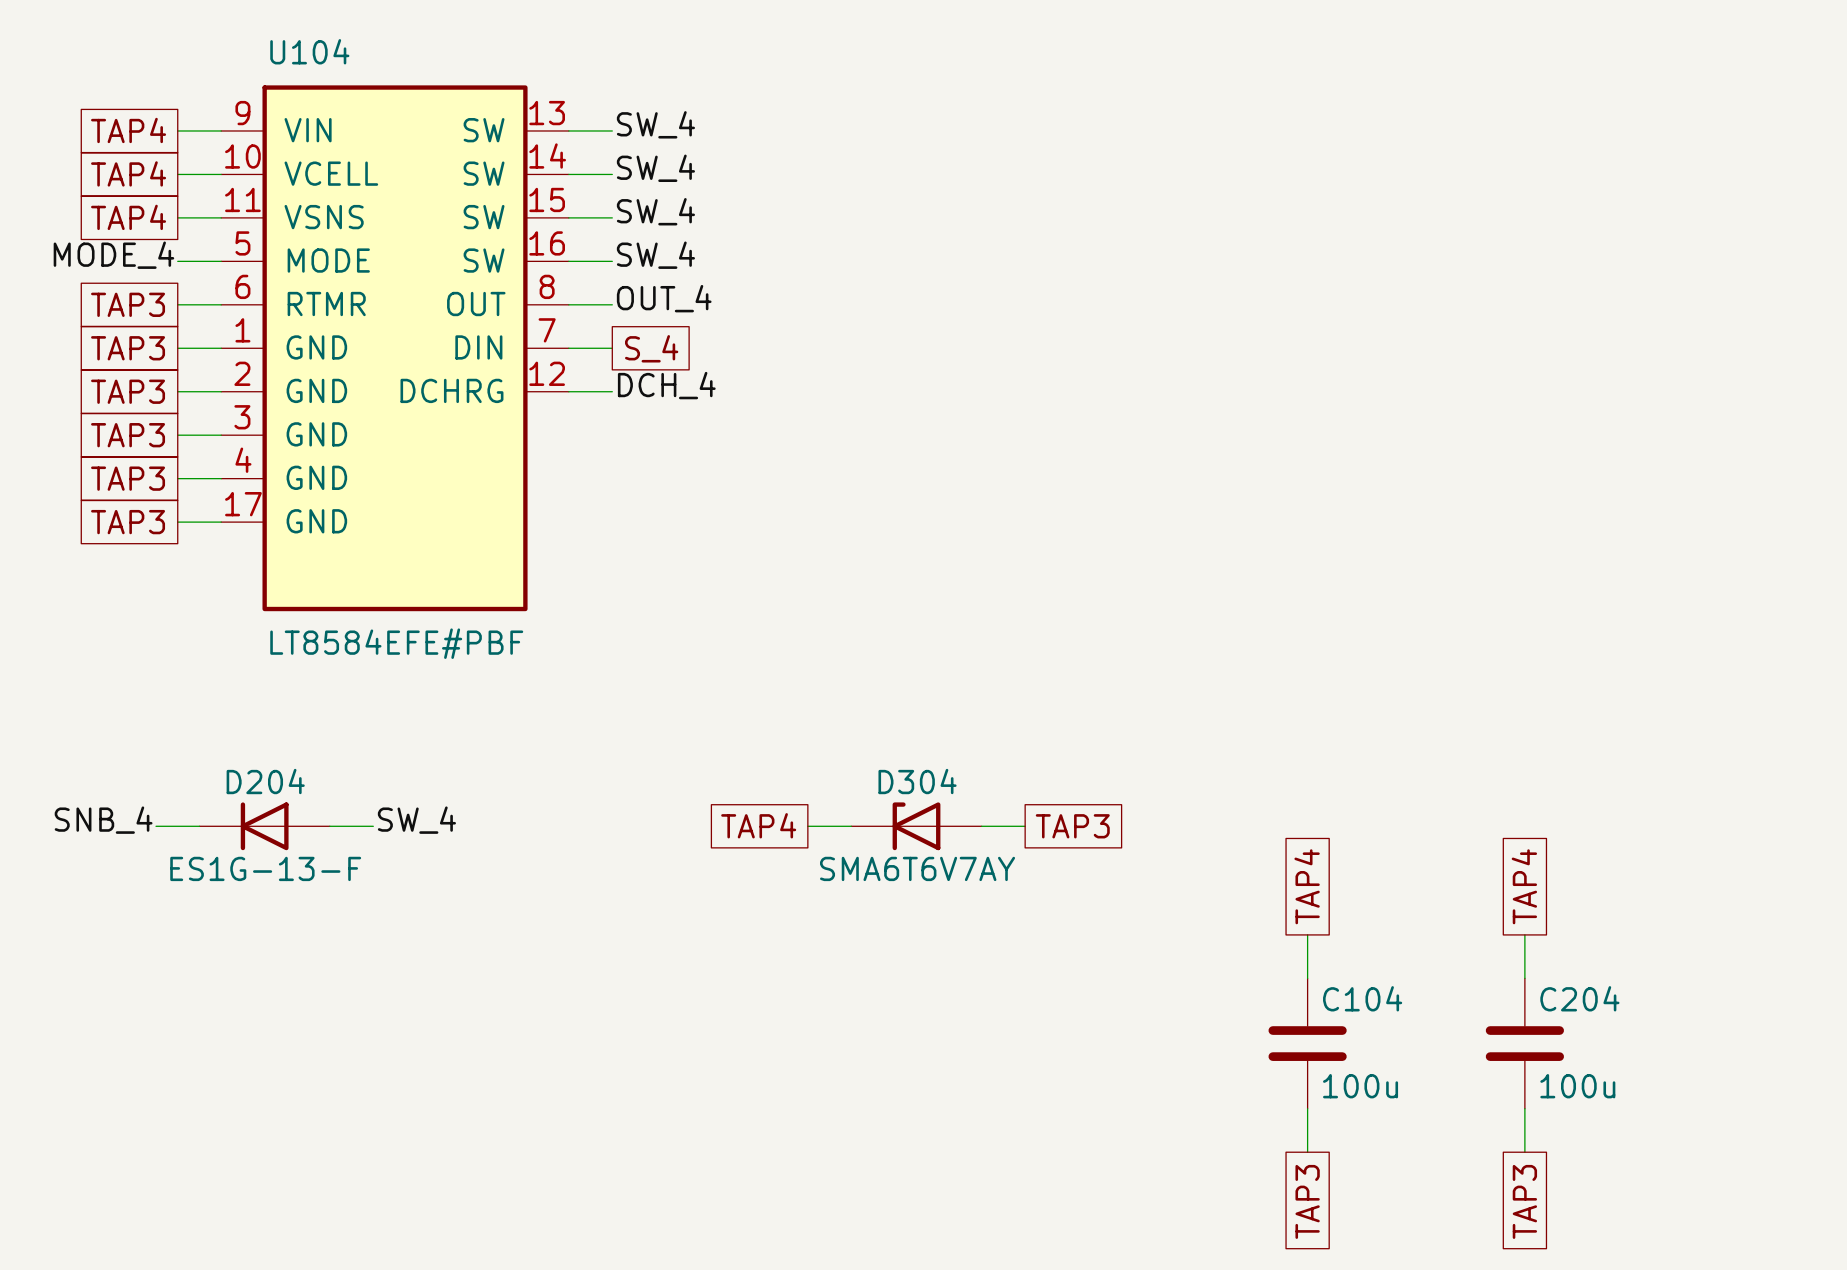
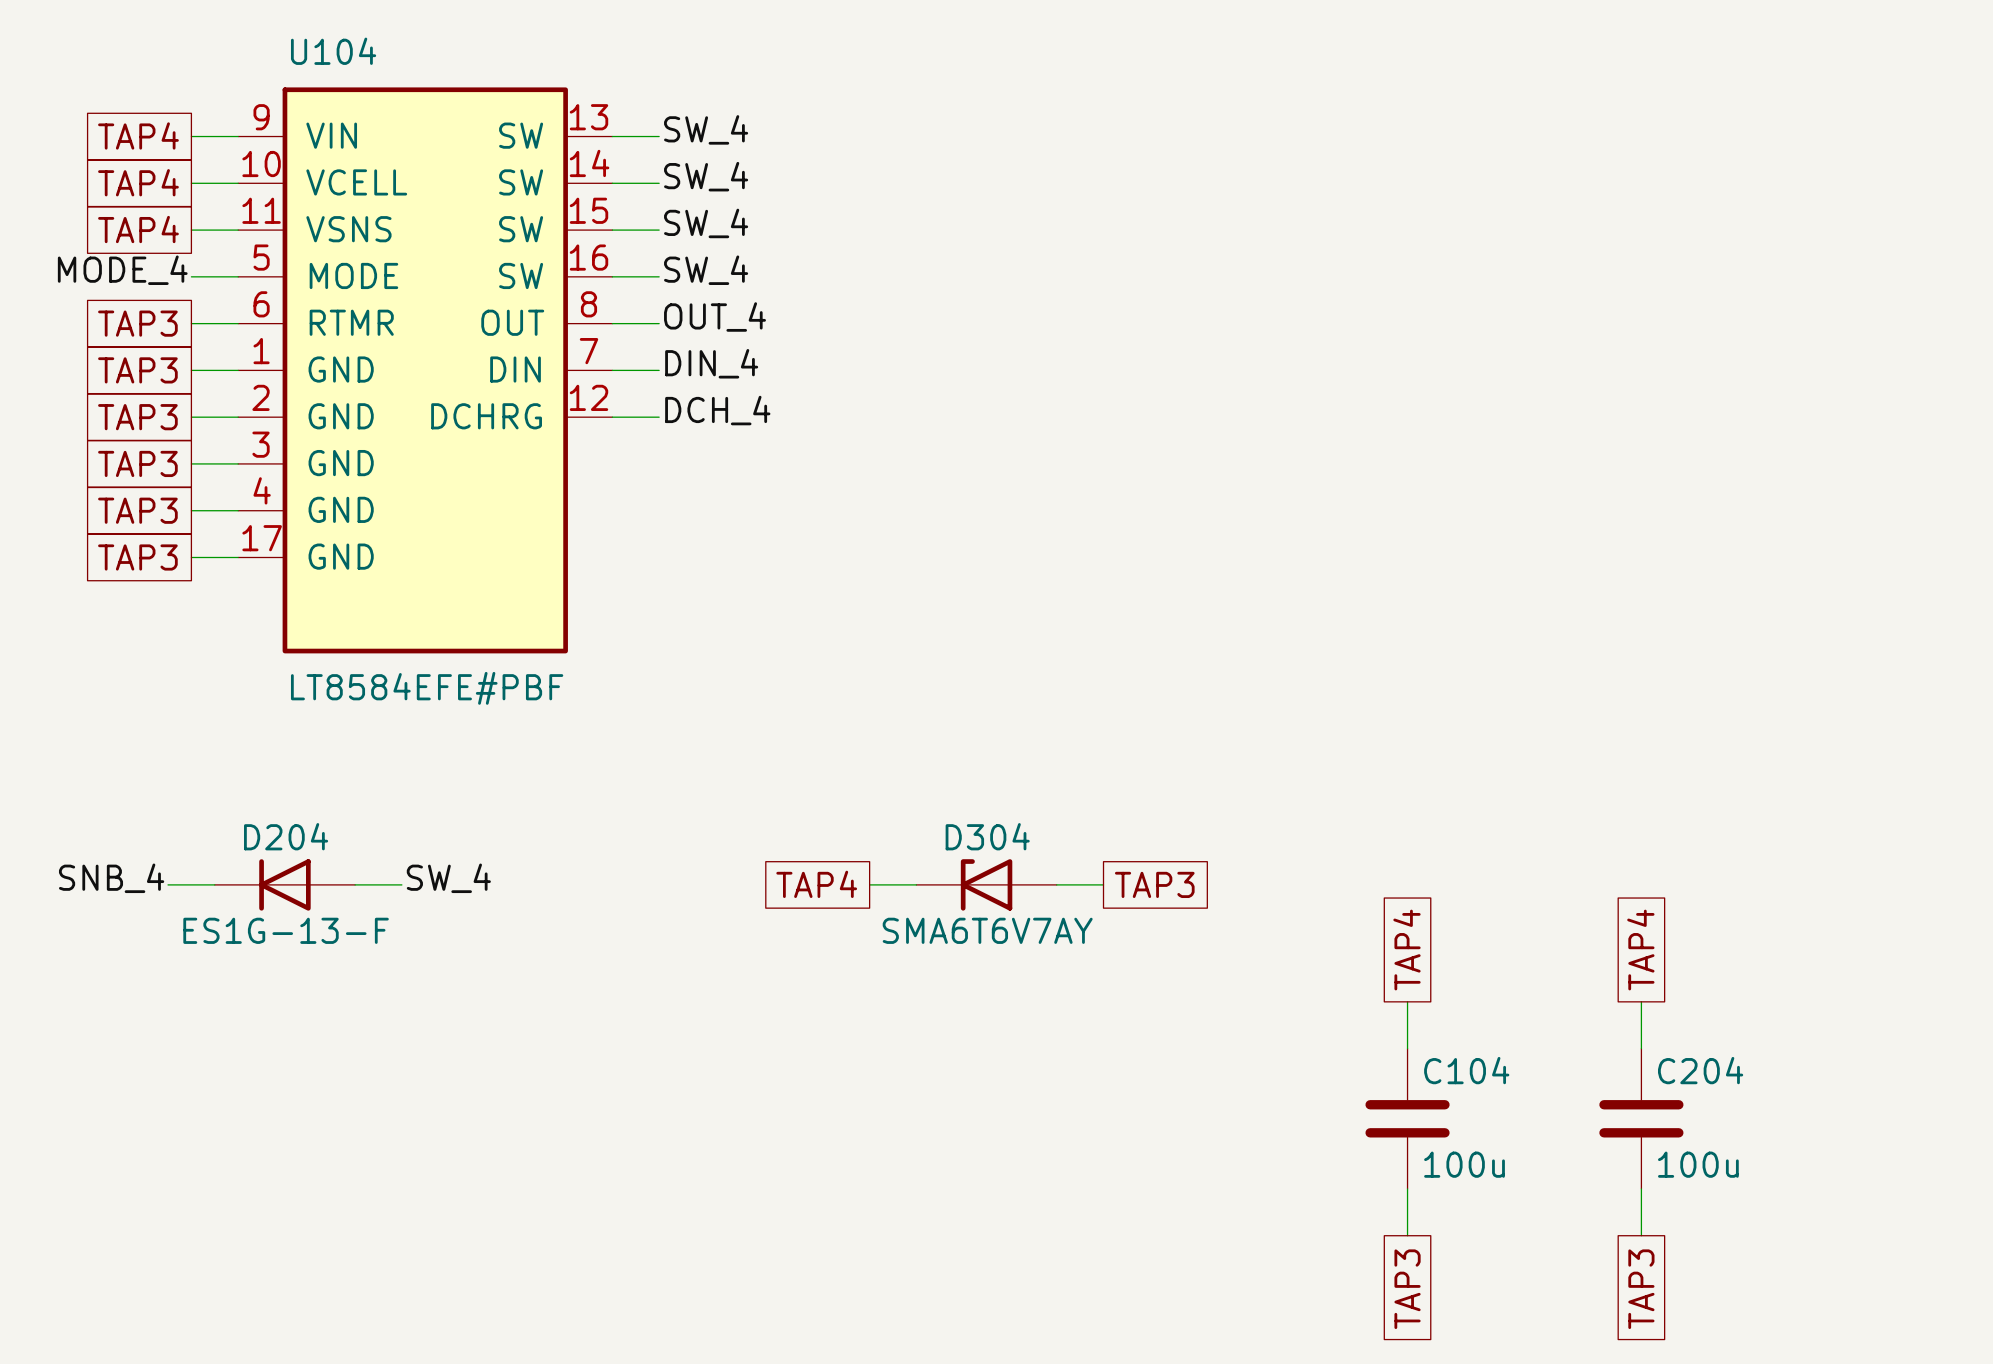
label: none -> DIN_4 (711, 363)
global label: S_4 (651, 348) -> none

